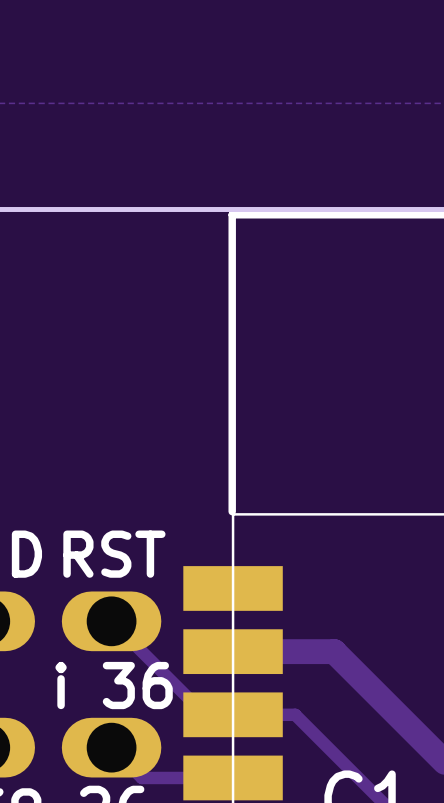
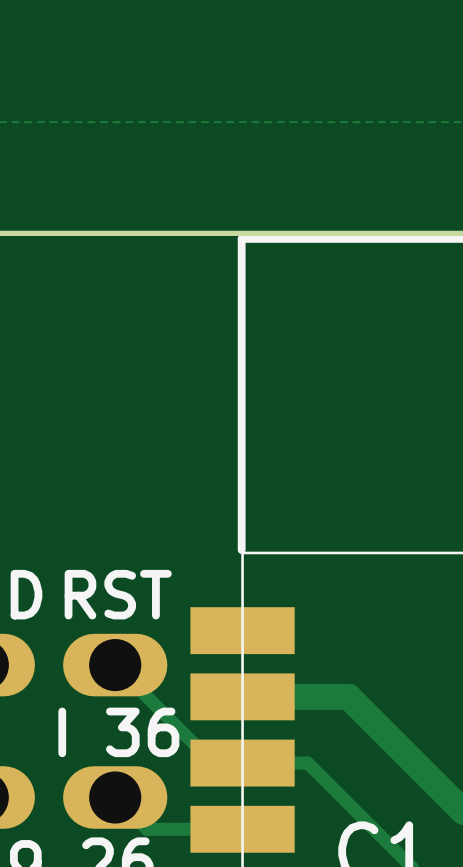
text: i 36 (114, 685) -> I 36 (118, 732)

